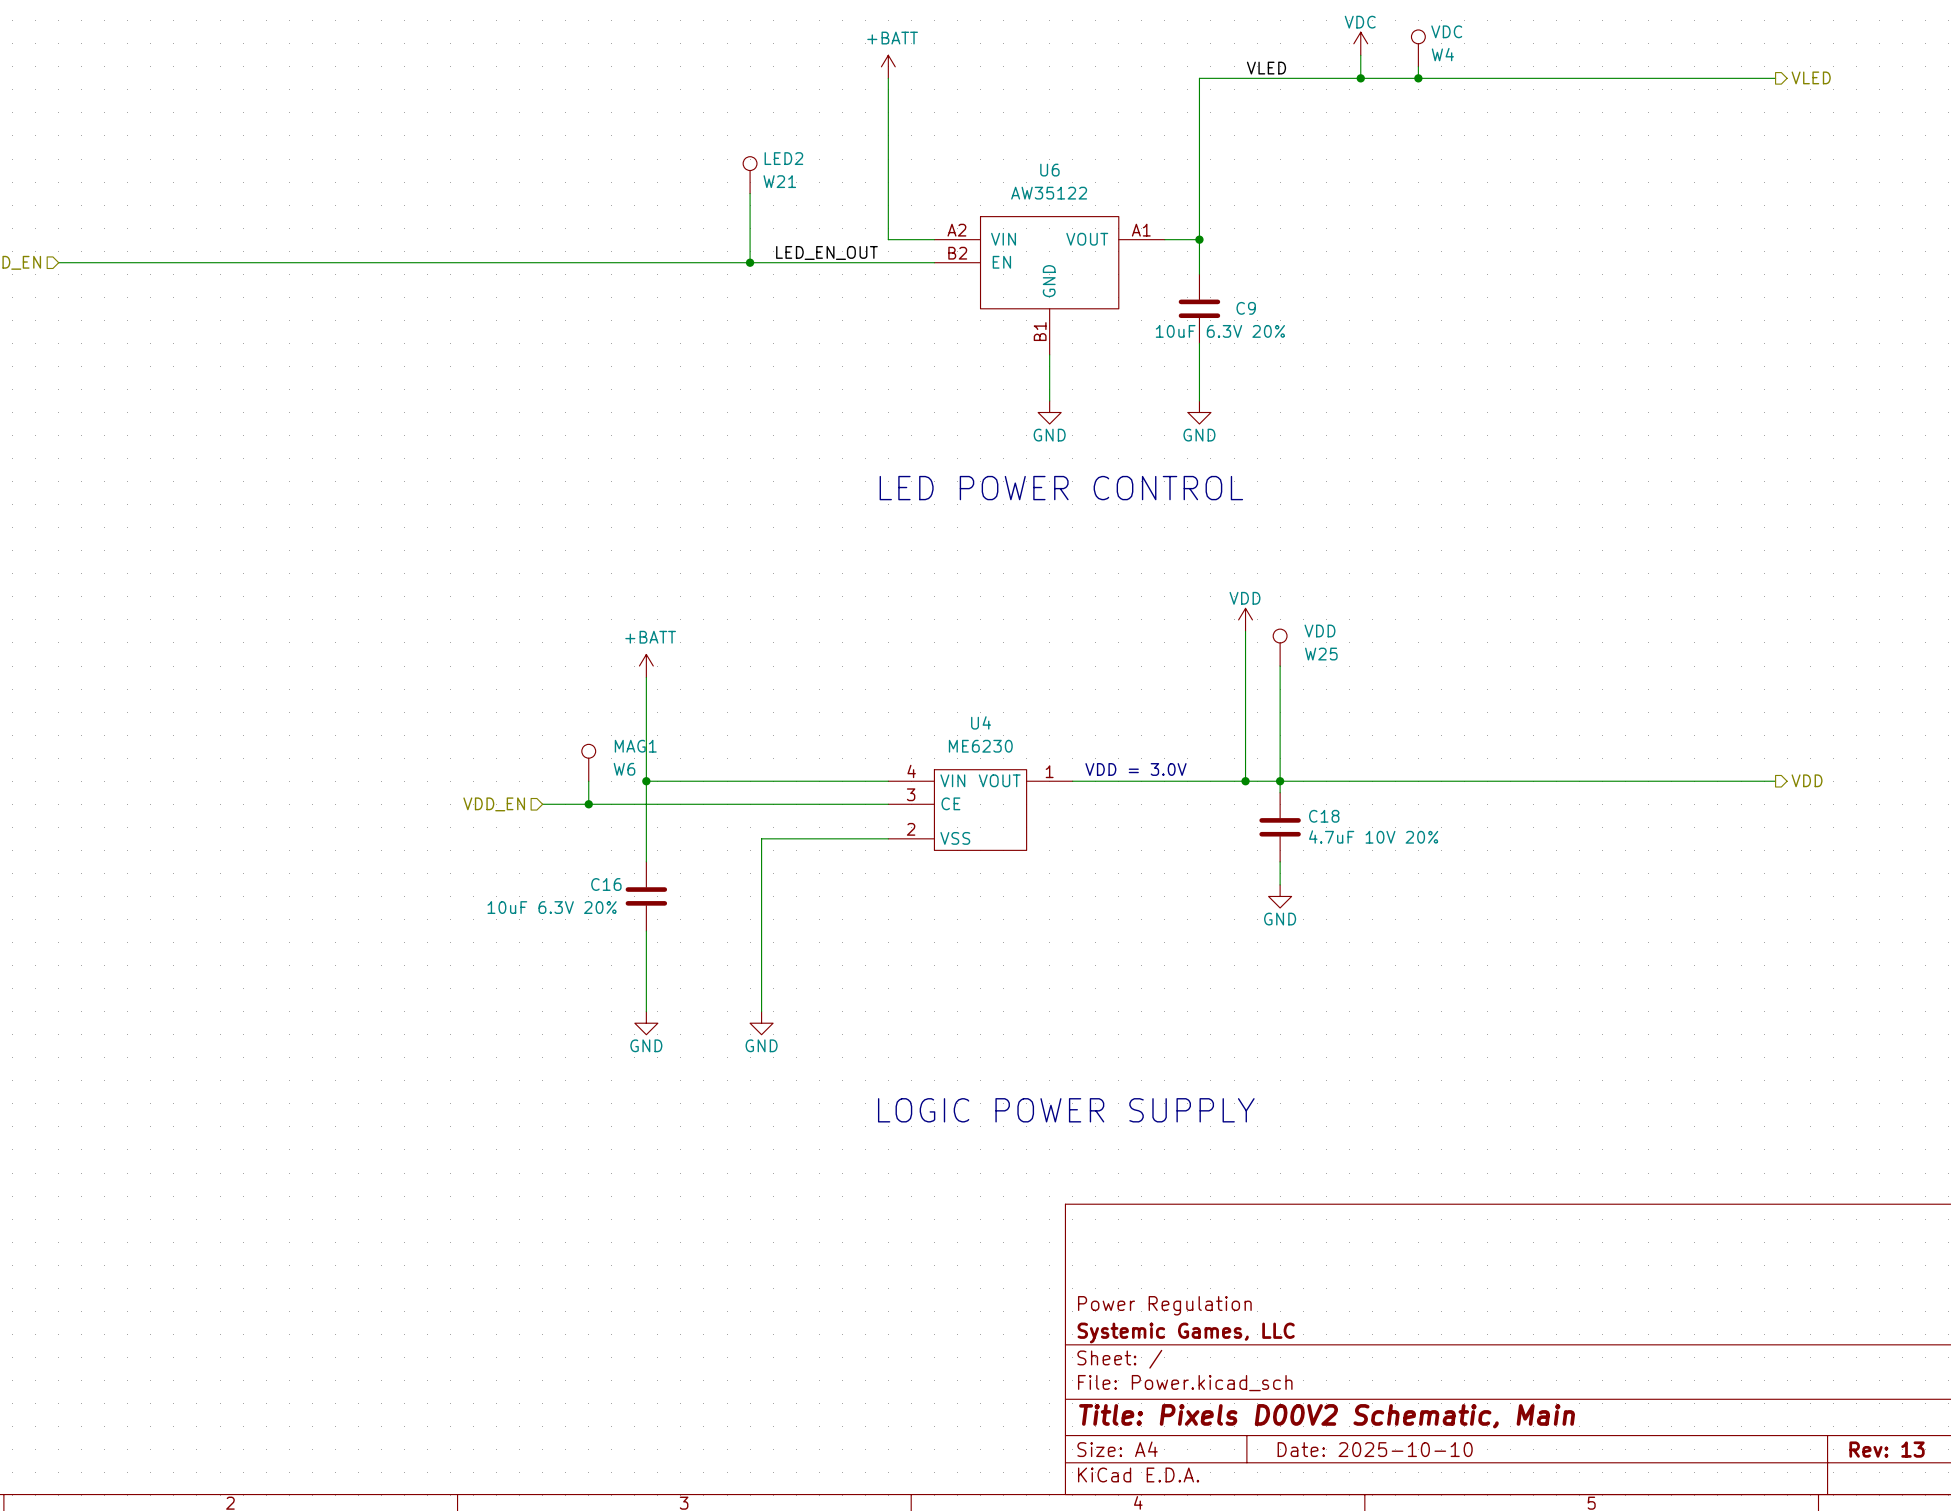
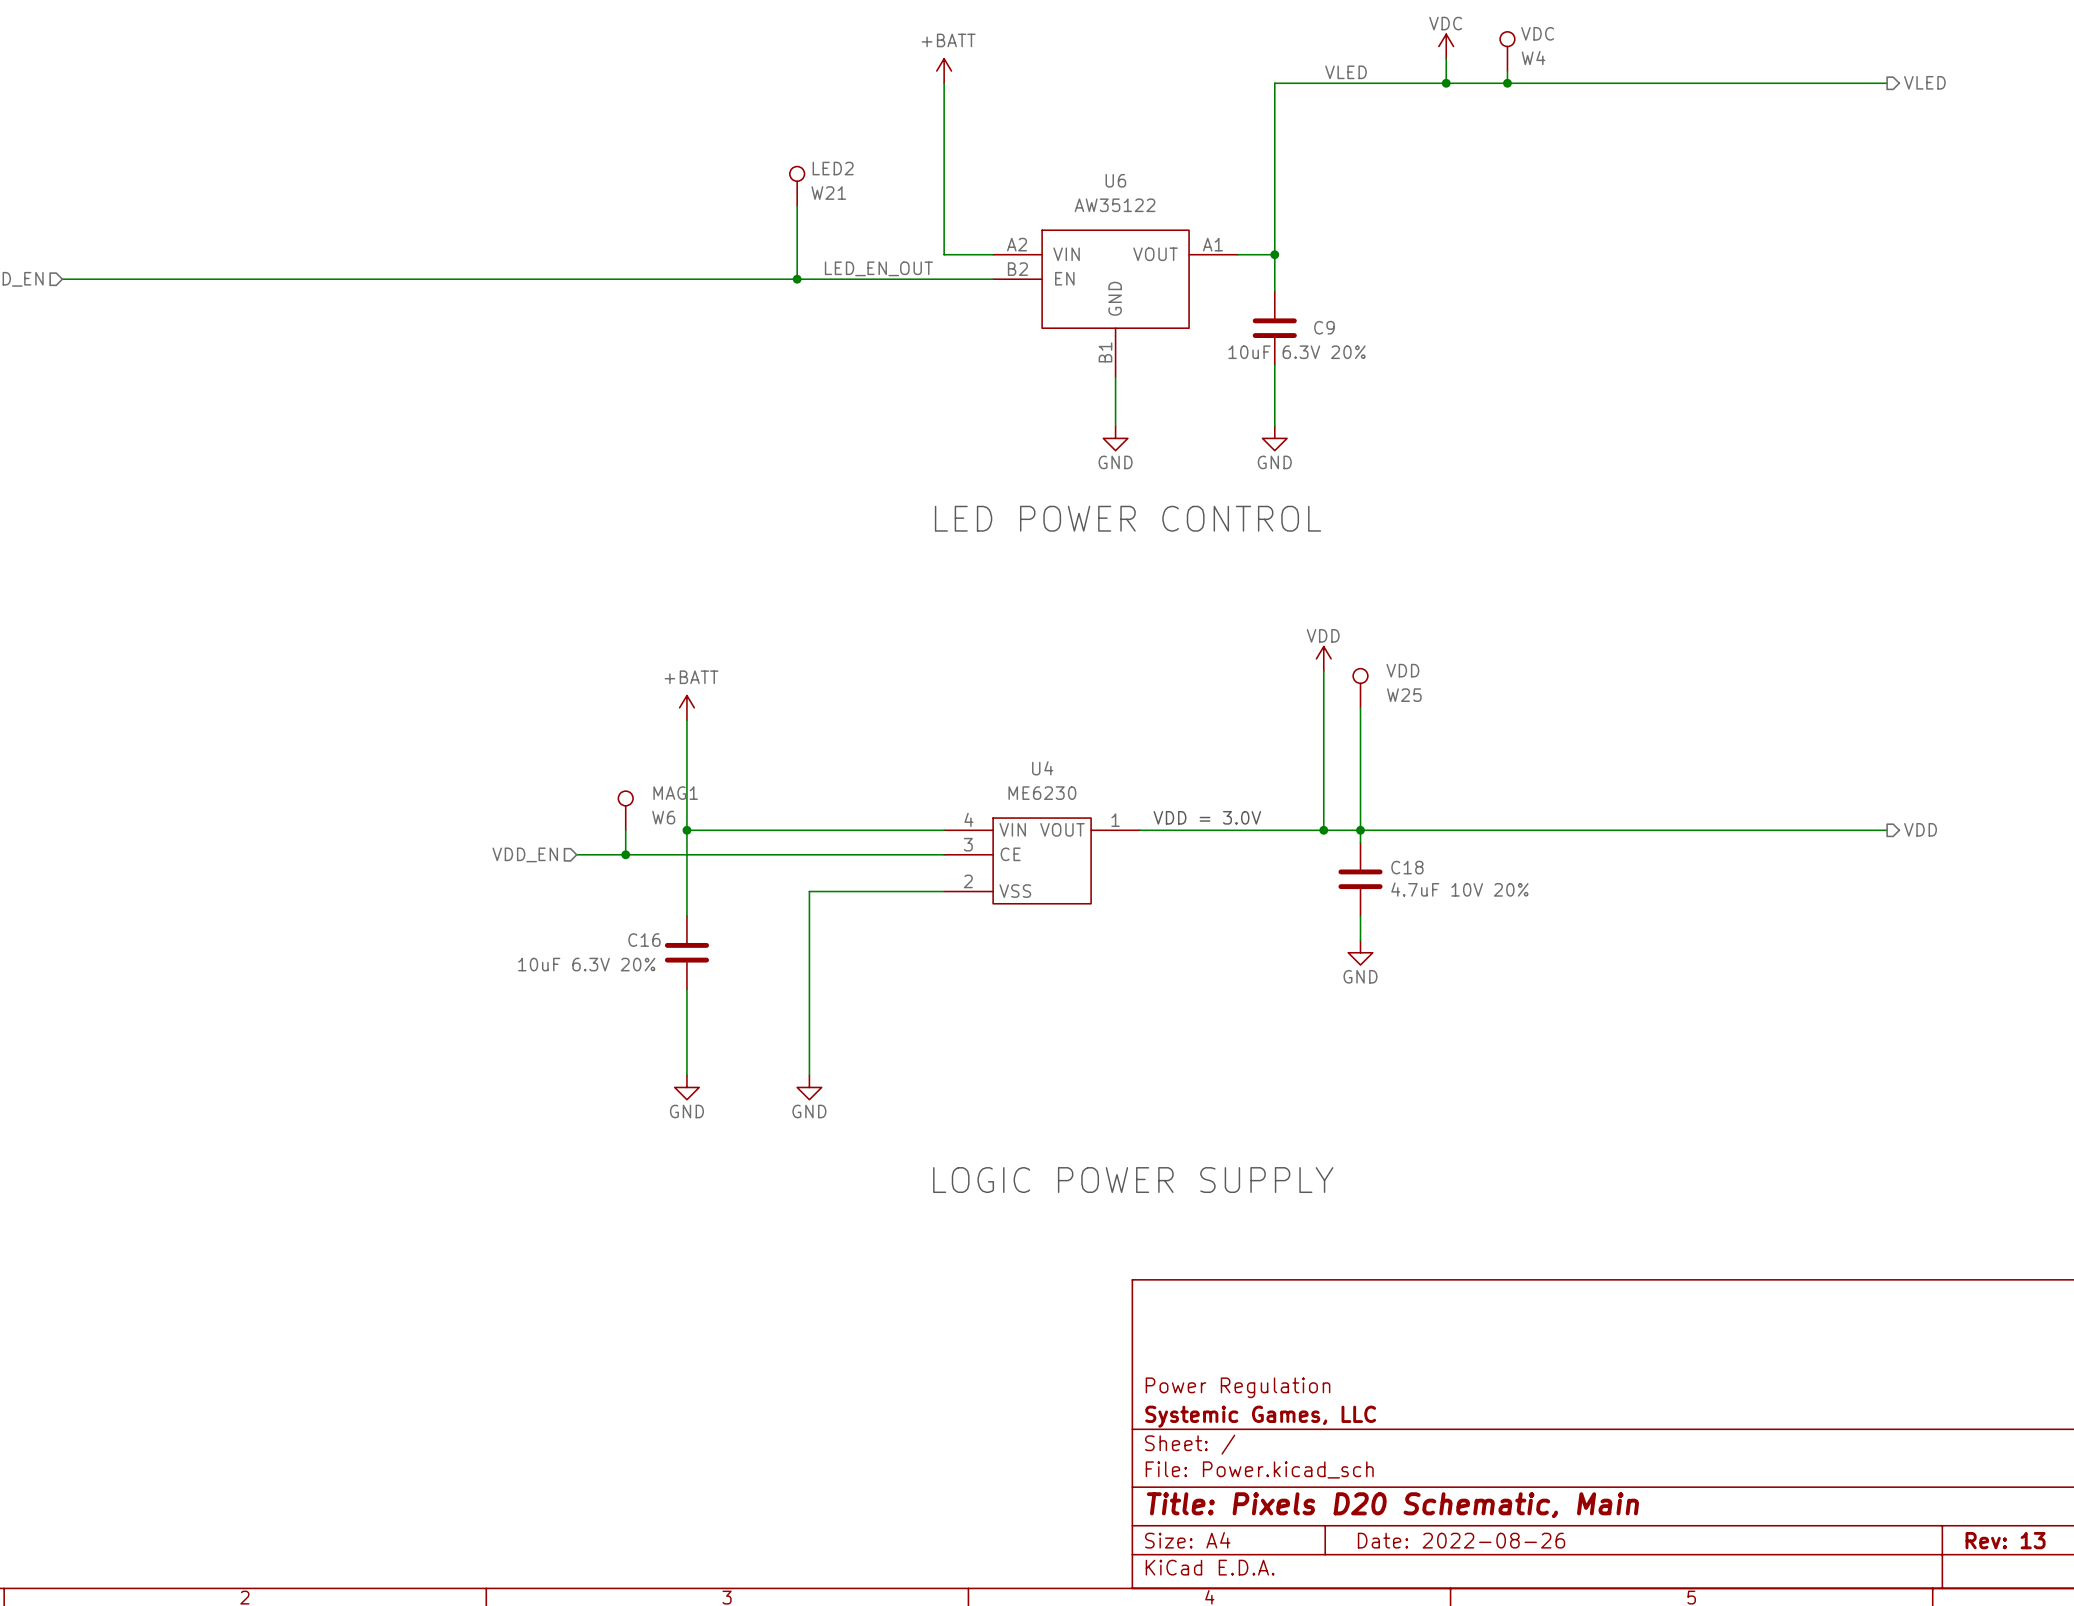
title block: Title: Pixels D00V2 Schematic, Main (1327, 1416) -> Title: Pixels D20 Schematic, Main (1392, 1505)
title block: Date: 2025-10-10 (1375, 1449) -> Date: 2022-08-26 (1461, 1540)

